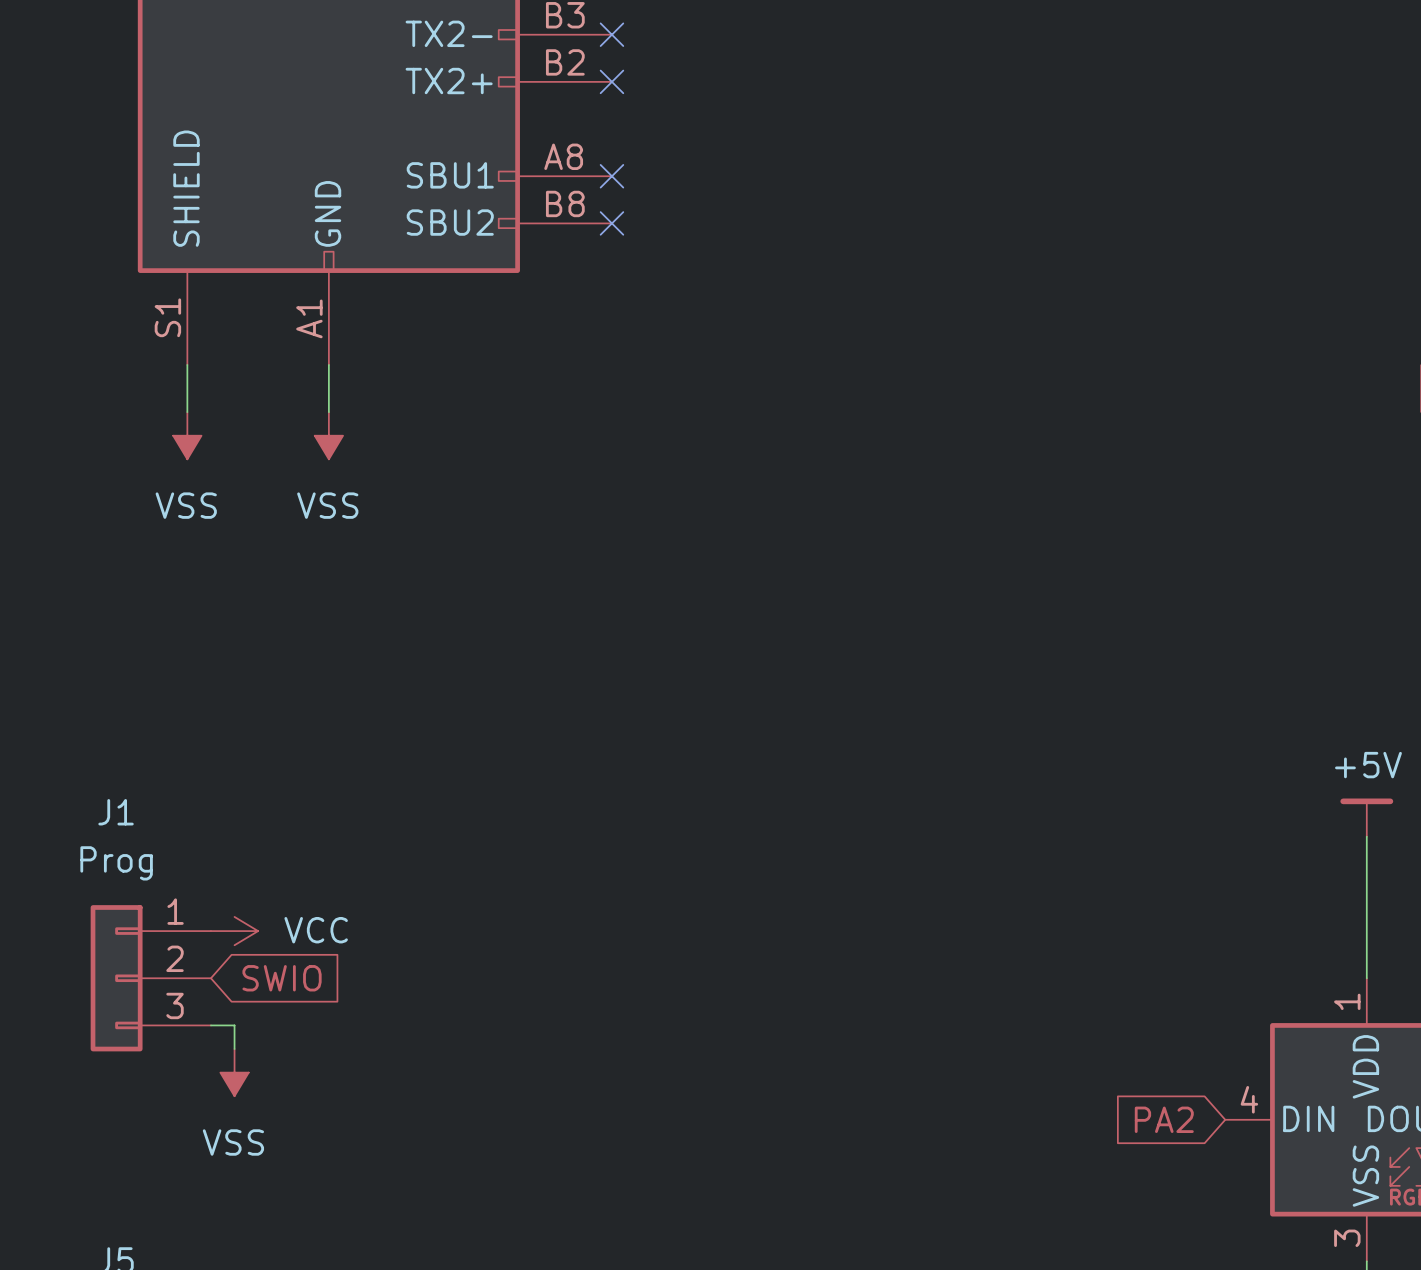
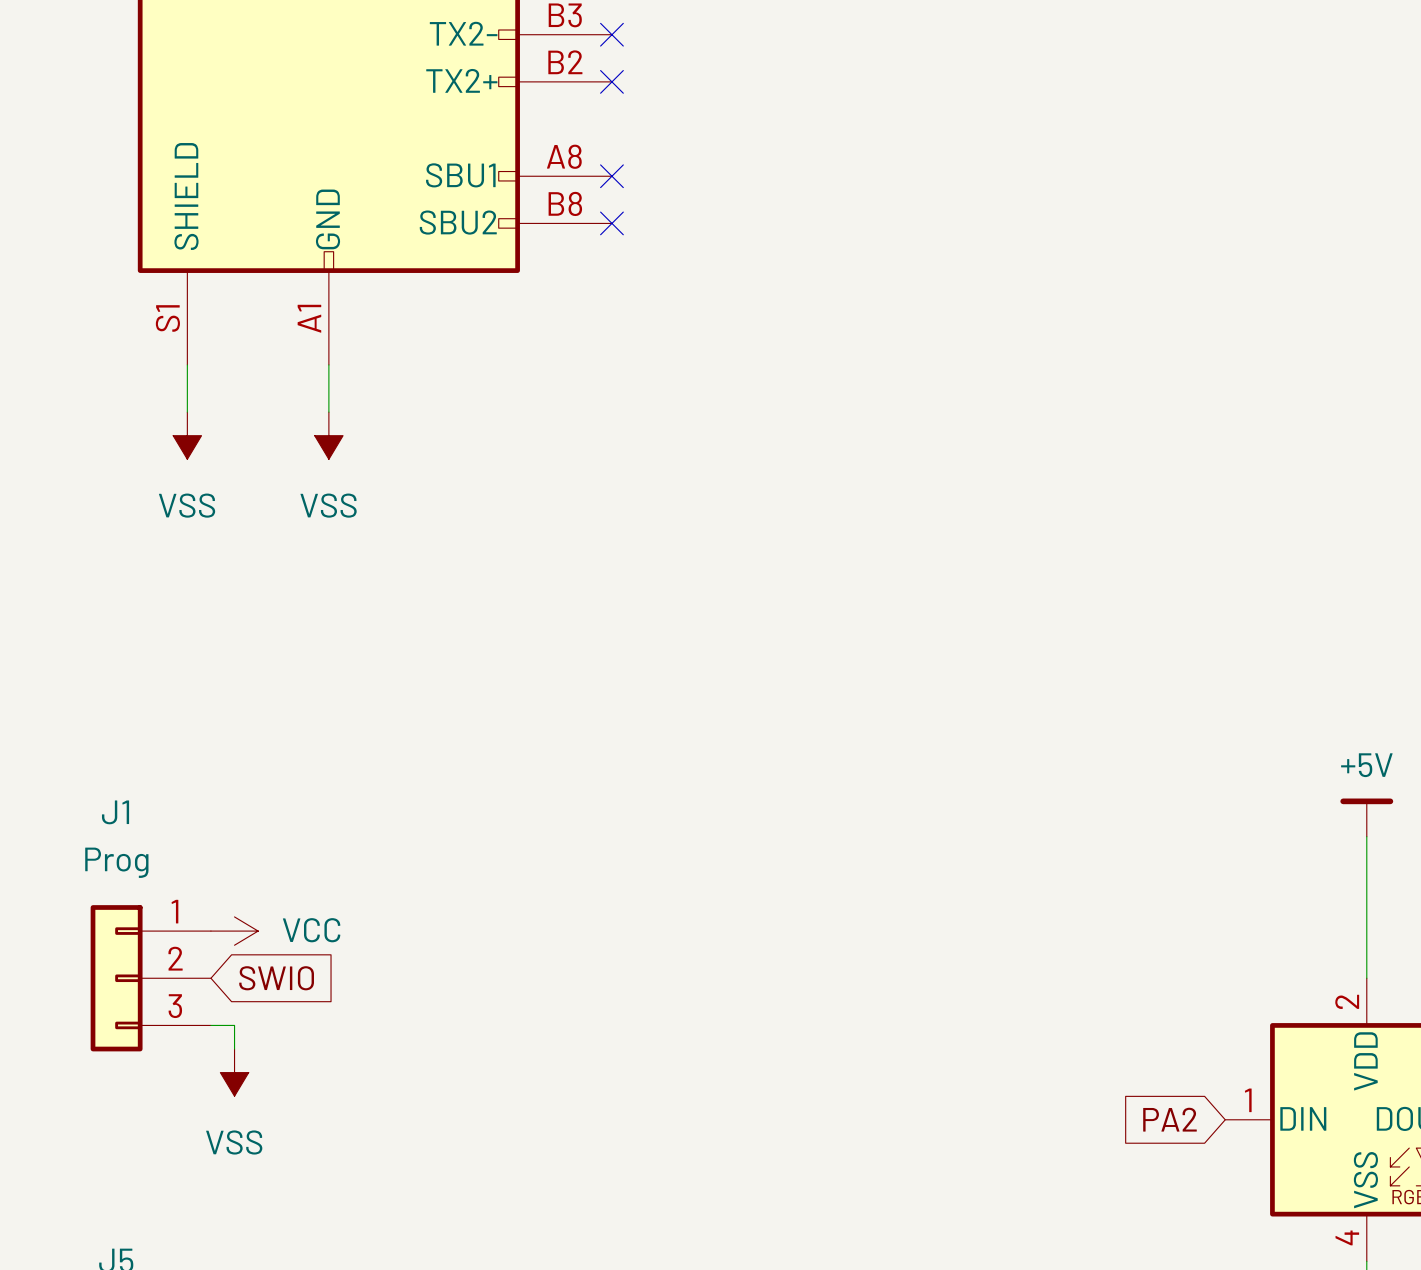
part pin number: 1 (1347, 1001) -> 2 (1347, 1001)
part pin number: 4 (1249, 1099) -> 1 (1248, 1100)
part pin number: 3 (1347, 1238) -> 4 (1347, 1237)

